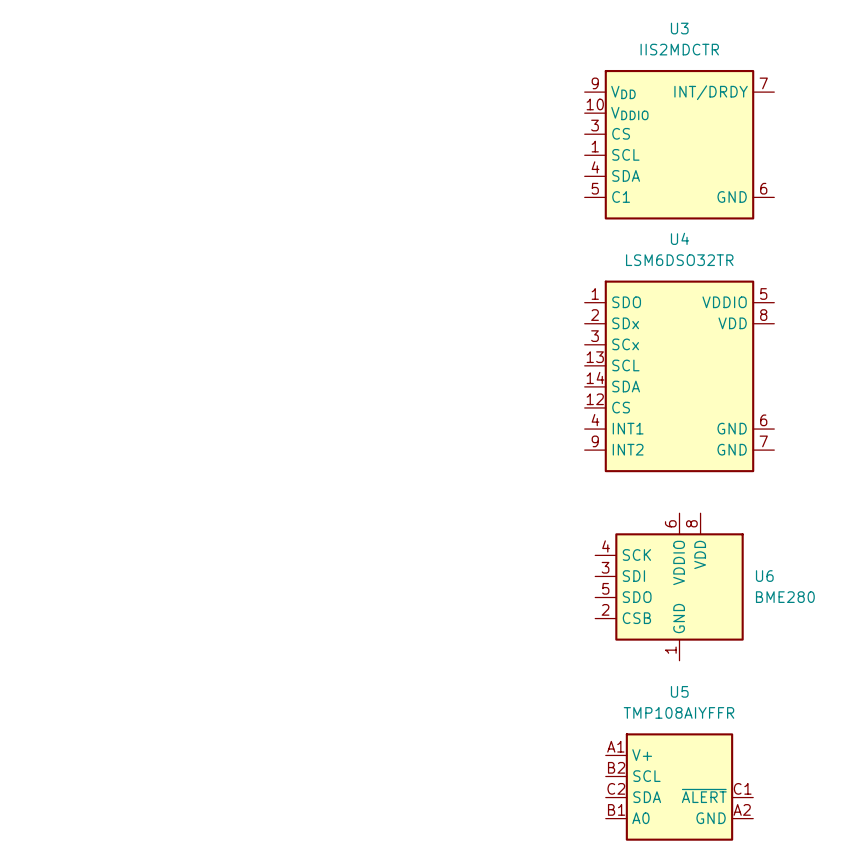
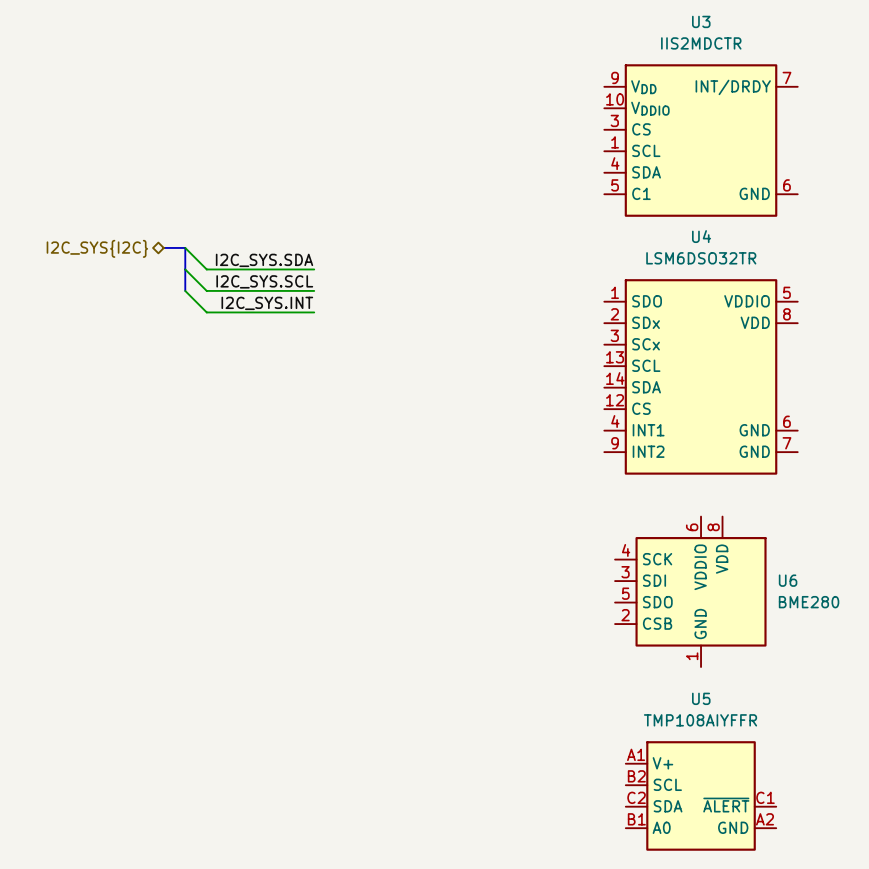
hierarchical label: none -> I2C_SYS{I2C} (97, 248)
bus: none -> (163, 247) (185, 247) (185, 290)
wire: none -> (185, 247) (206, 269) (314, 269)
label: none -> I2C_SYS.SDA (264, 260)
wire: none -> (185, 269) (206, 290) (314, 290)
label: none -> I2C_SYS.SCL (264, 281)
wire: none -> (185, 290) (206, 312) (314, 312)
label: none -> I2C_SYS.INT (267, 303)

